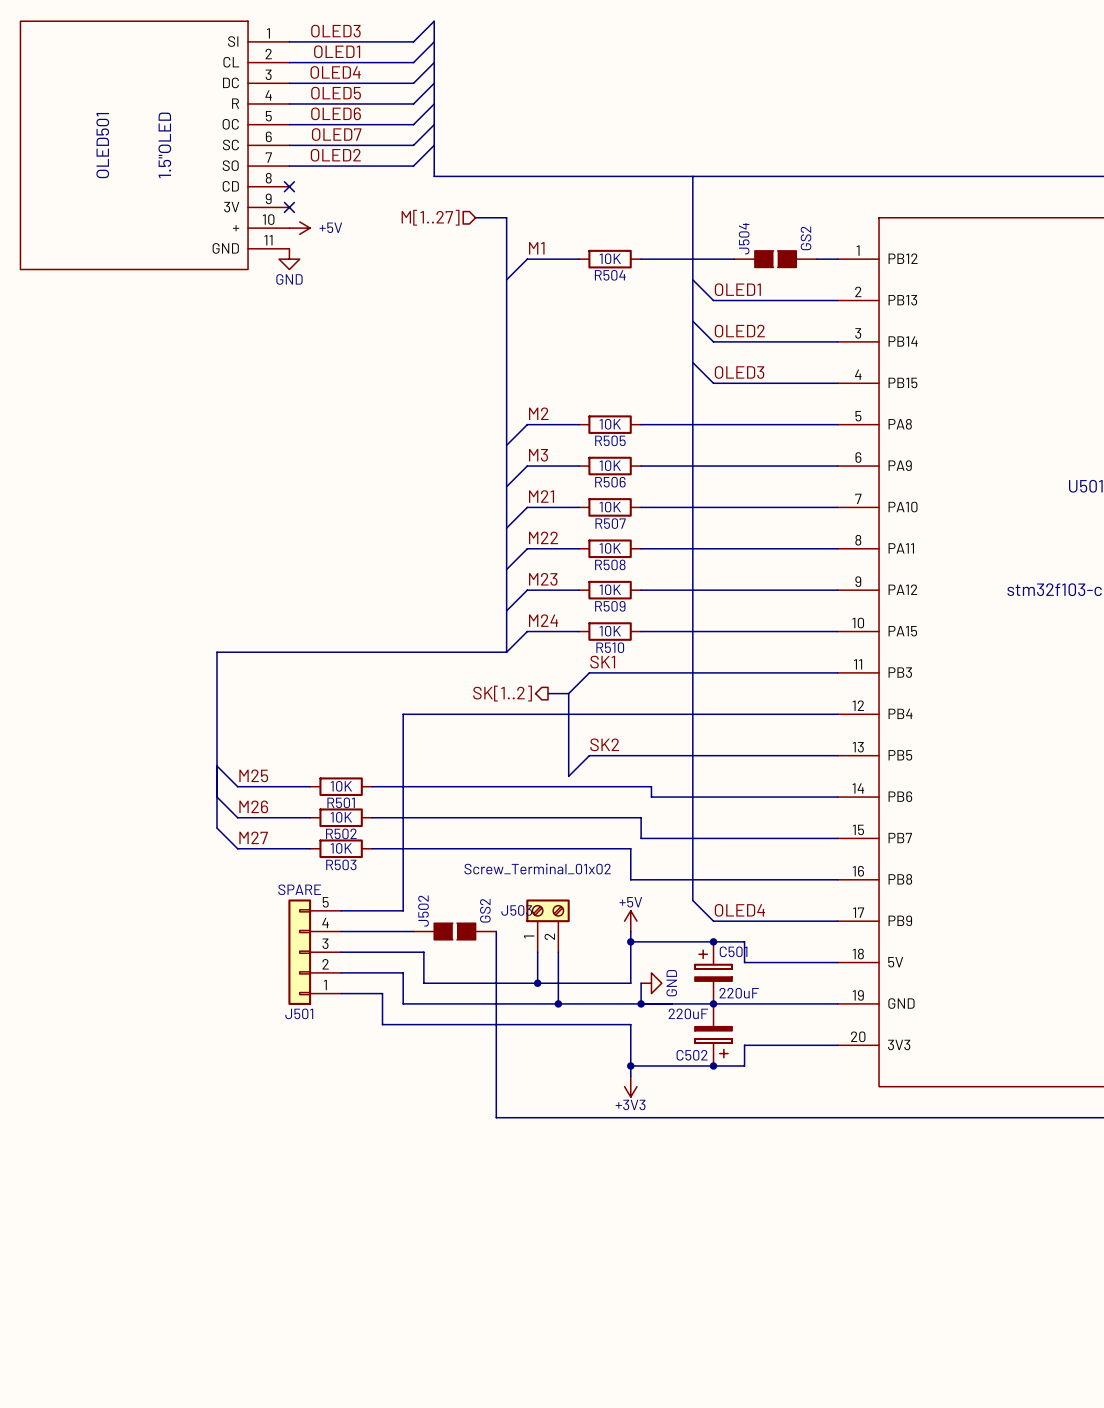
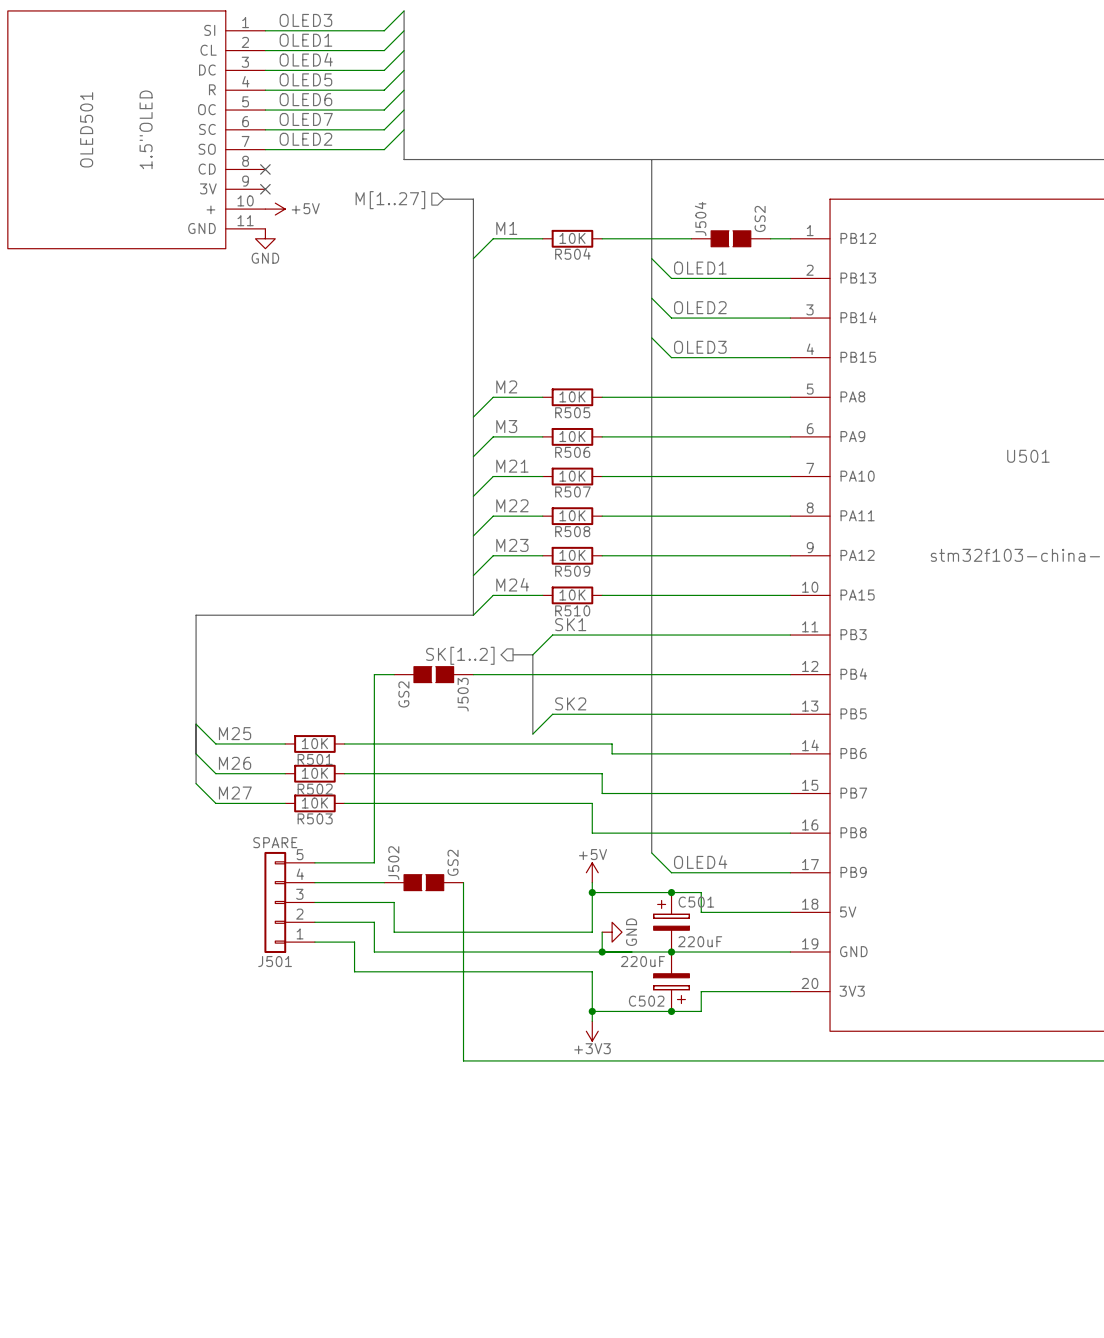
J503 value: Screw_Terminal_01x02 (537, 869) -> GS2 (403, 694)
J503 symbol: [526, 899, 570, 953] -> [394, 666, 474, 683]
J503 name position: J503 (516, 910) -> J503 (463, 694)
wire: (537, 952) (537, 983) -> none
wire: (558, 952) (558, 1003) -> none
junction: (537, 983) -> none
junction: (558, 1003) -> none

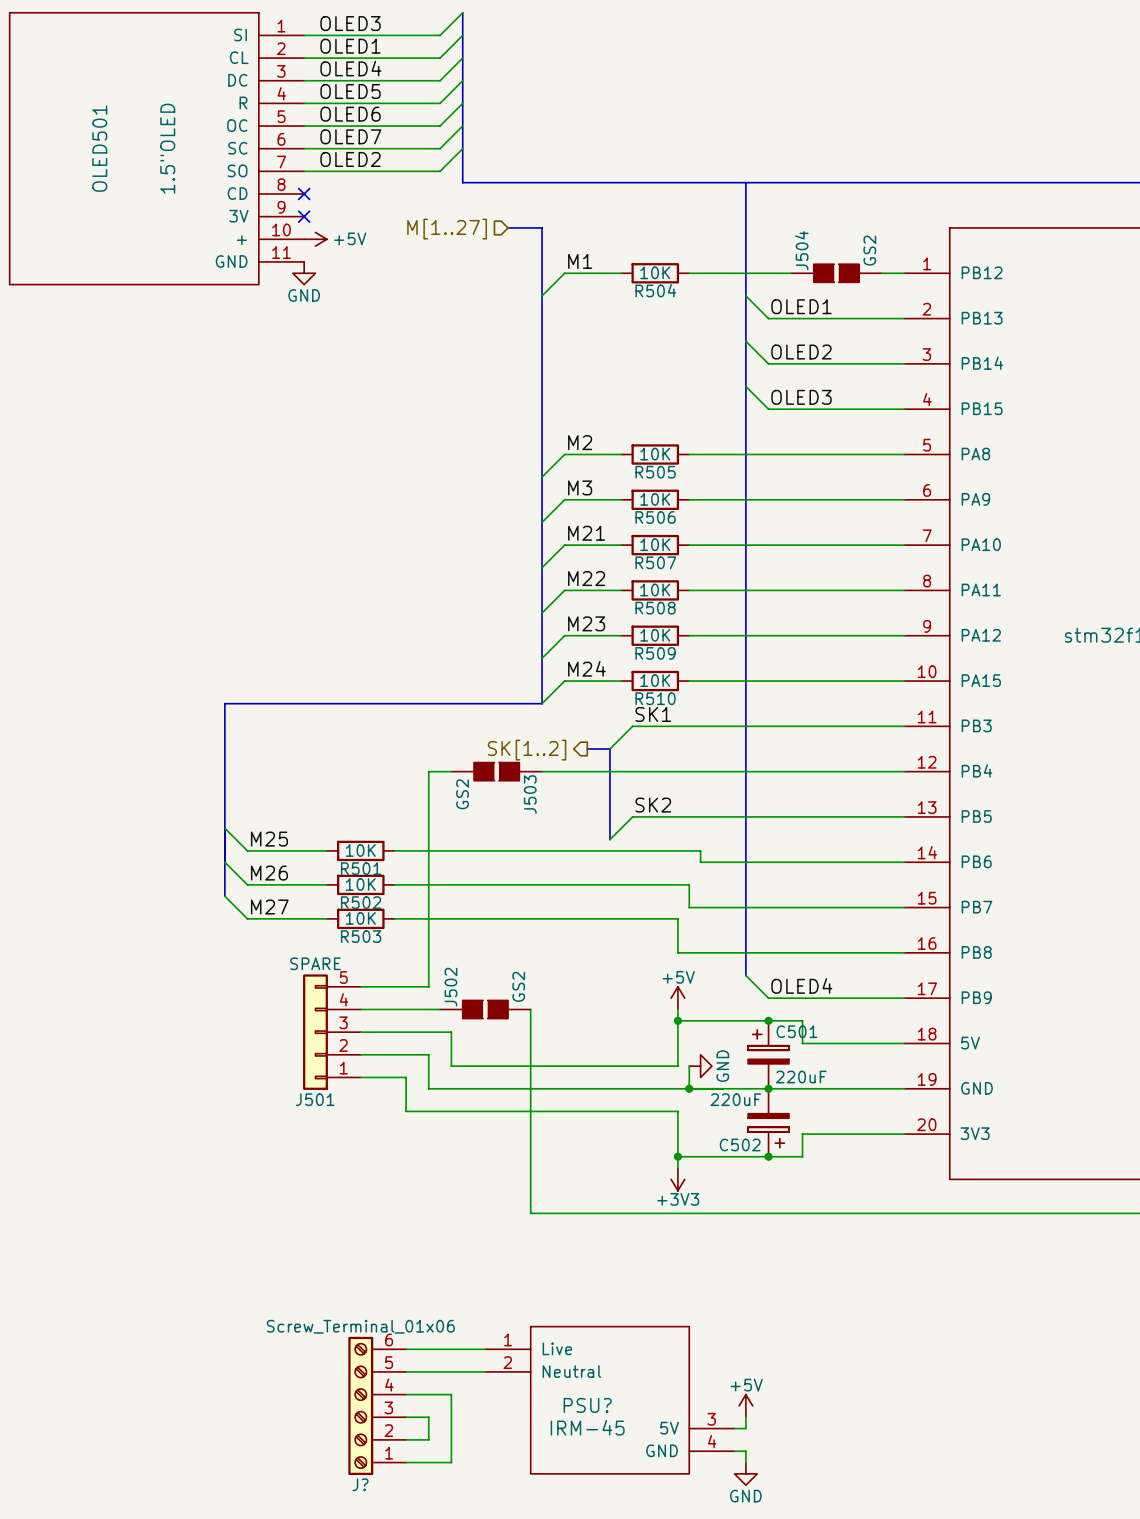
wire: none -> (406, 1349) (485, 1349)
wire: none -> (406, 1371) (485, 1371)
wire: none -> (406, 1394) (451, 1394) (451, 1462) (406, 1462)
PSU?: none -> IRM-45 (609, 1400)
J?: none -> Screw_Terminal_01x06 (377, 1405)
power symbol: none -> +5V (745, 1405)
wire: none -> (406, 1417) (428, 1417) (428, 1439) (406, 1439)
wire: none -> (745, 1417) (745, 1428) (734, 1428)
wire: none -> (734, 1451) (745, 1451) (745, 1462)
power symbol: none -> GND (745, 1473)

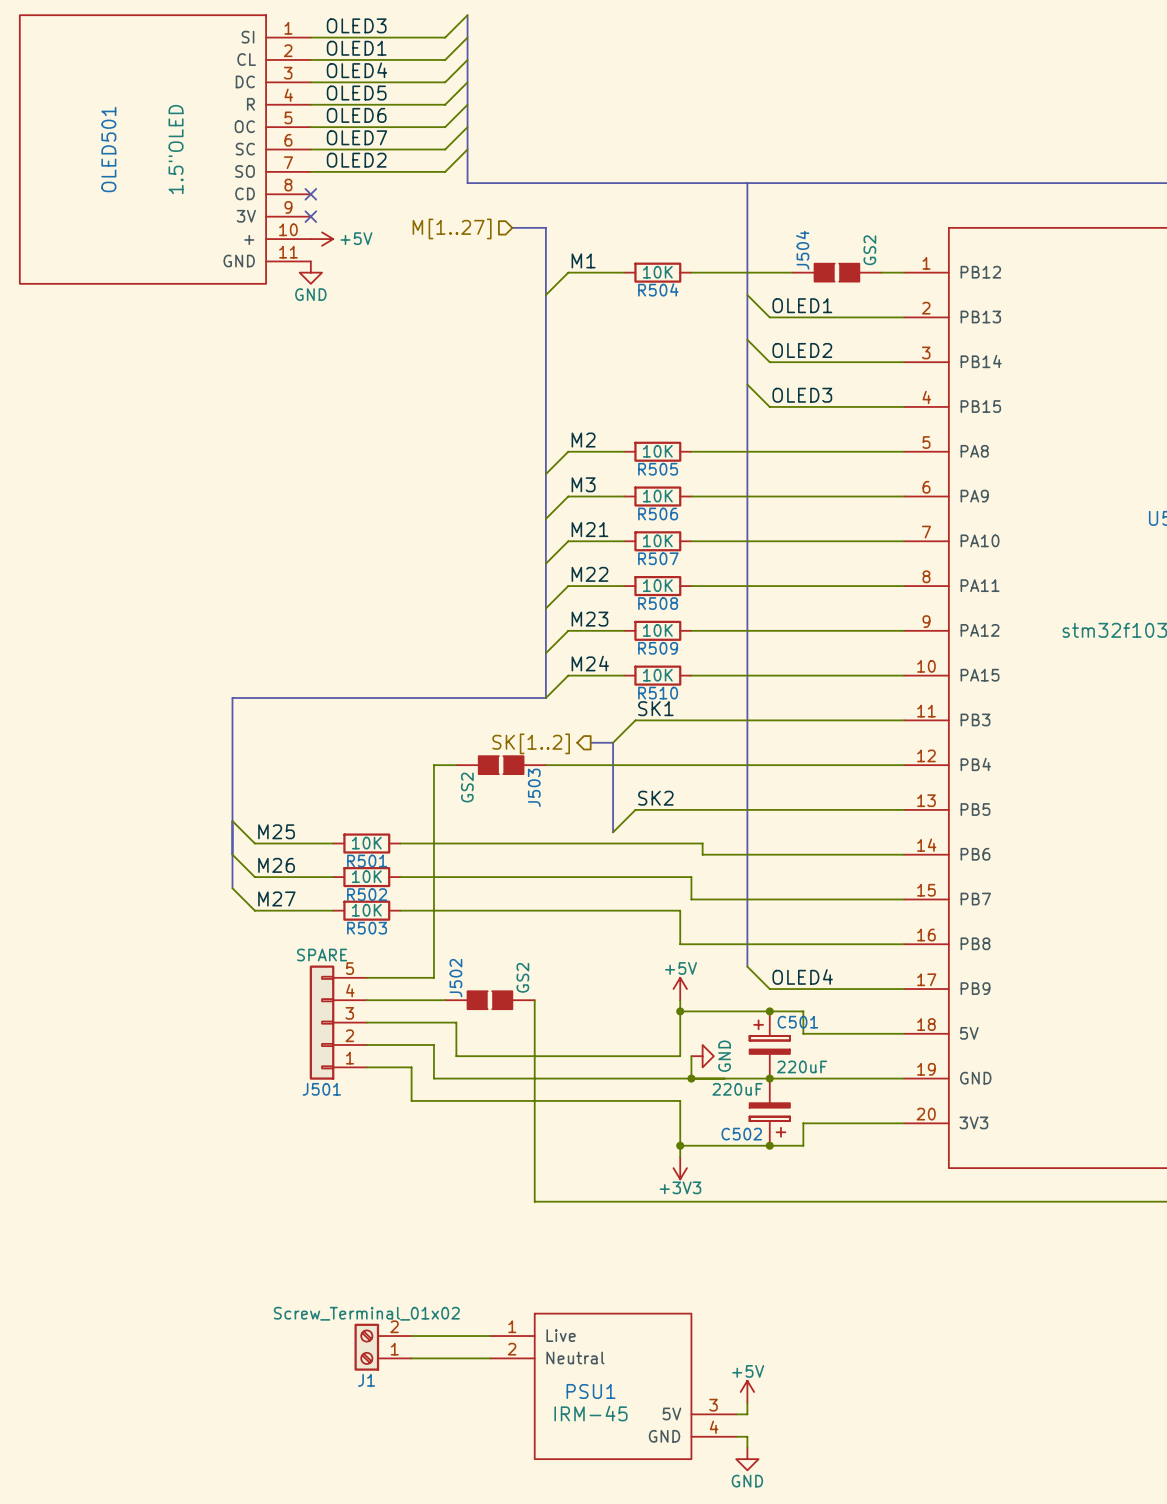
J1: none -> Screw_Terminal_01x02 (383, 1347)
wire: (406, 1394) (451, 1394) (451, 1462) (406, 1462) -> none
J?: Screw_Terminal_01x06 (377, 1405) -> none
PSU? name: PSU? (587, 1405) -> PSU1 (591, 1391)
wire: (406, 1417) (428, 1417) (428, 1439) (406, 1439) -> none

